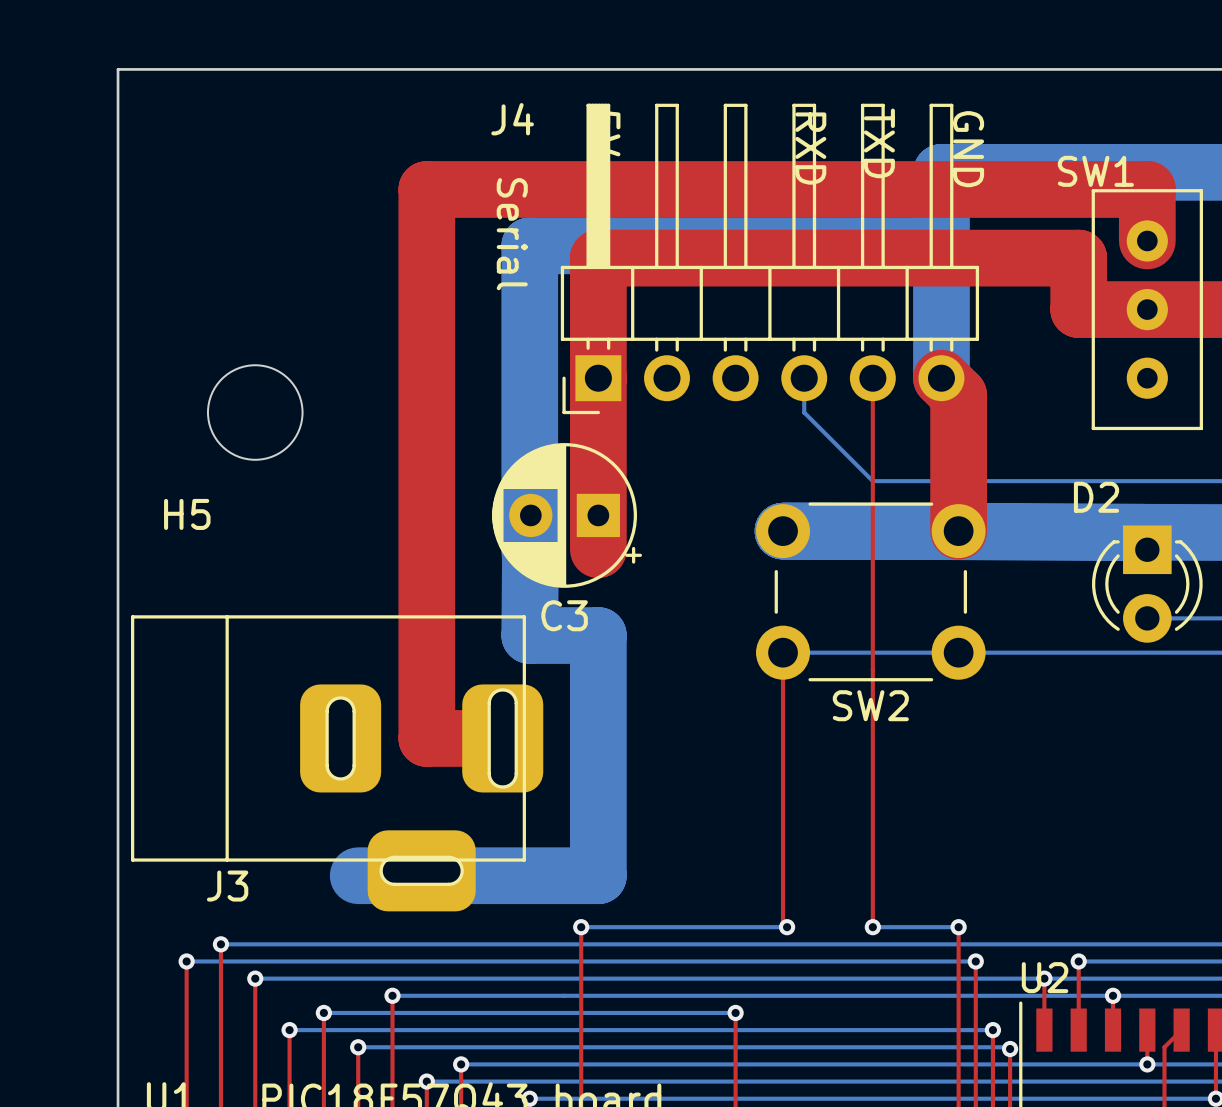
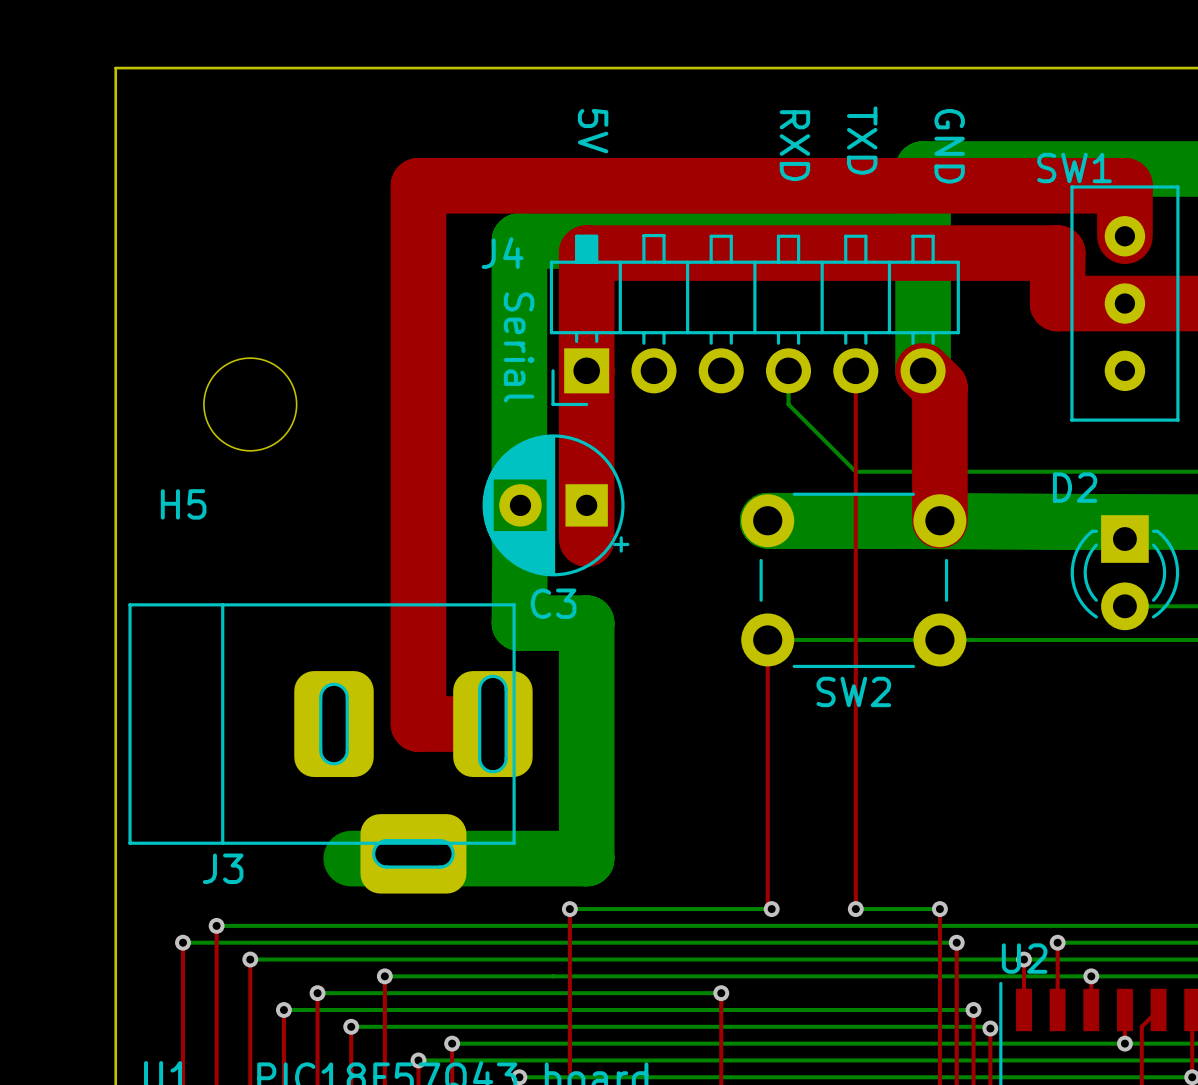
J4 footprint: [560, 103, 980, 415] -> [549, 234, 960, 407]
J4 name position: J4 (512, 119) -> J4 (502, 253)
text position: Serial (512, 234) -> Serial (519, 347)

